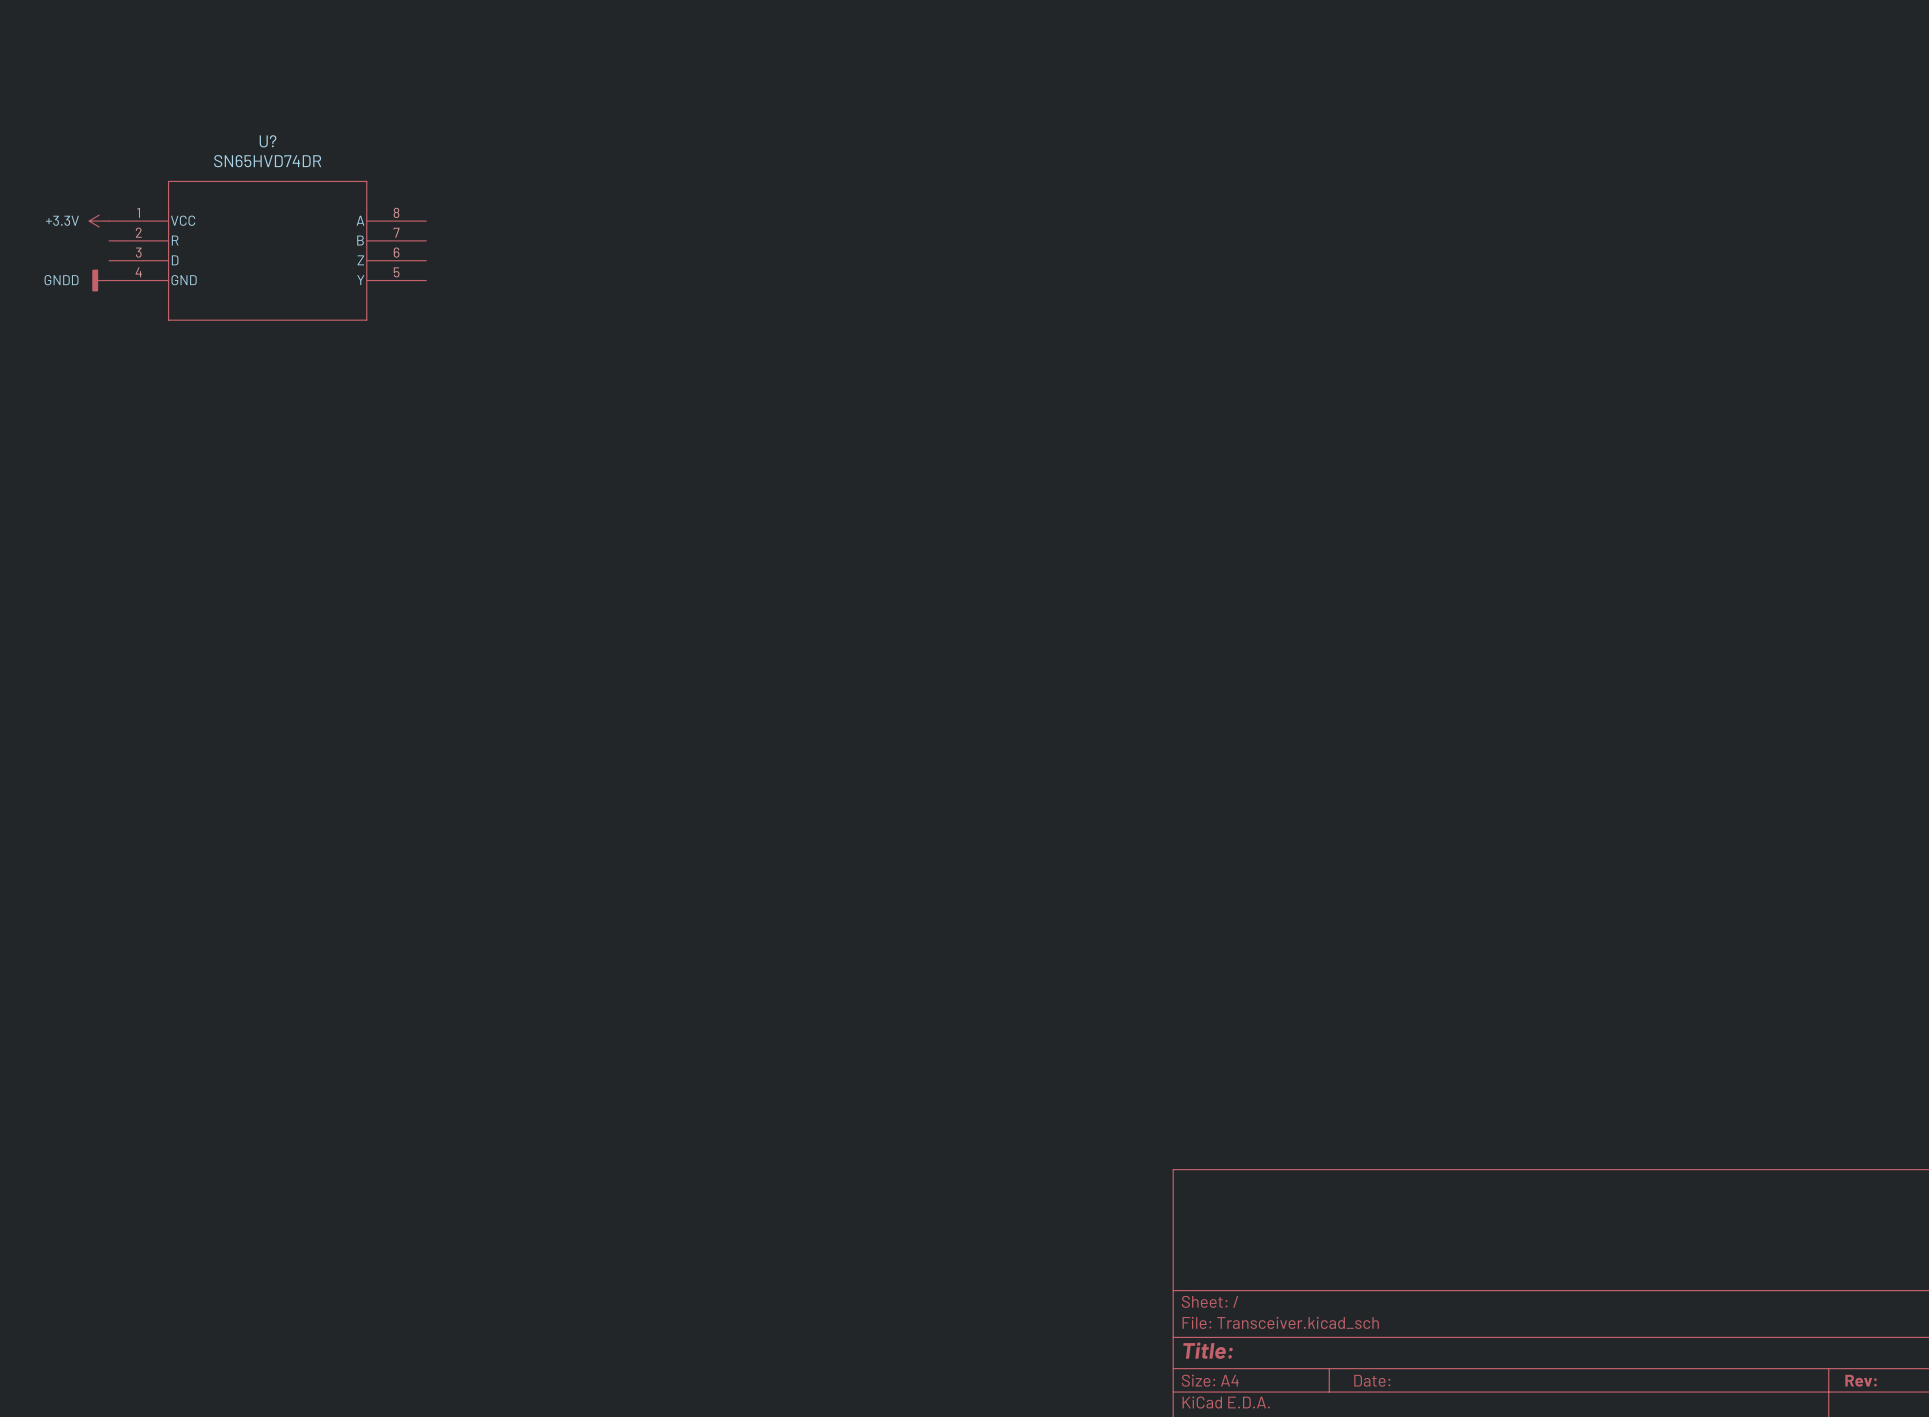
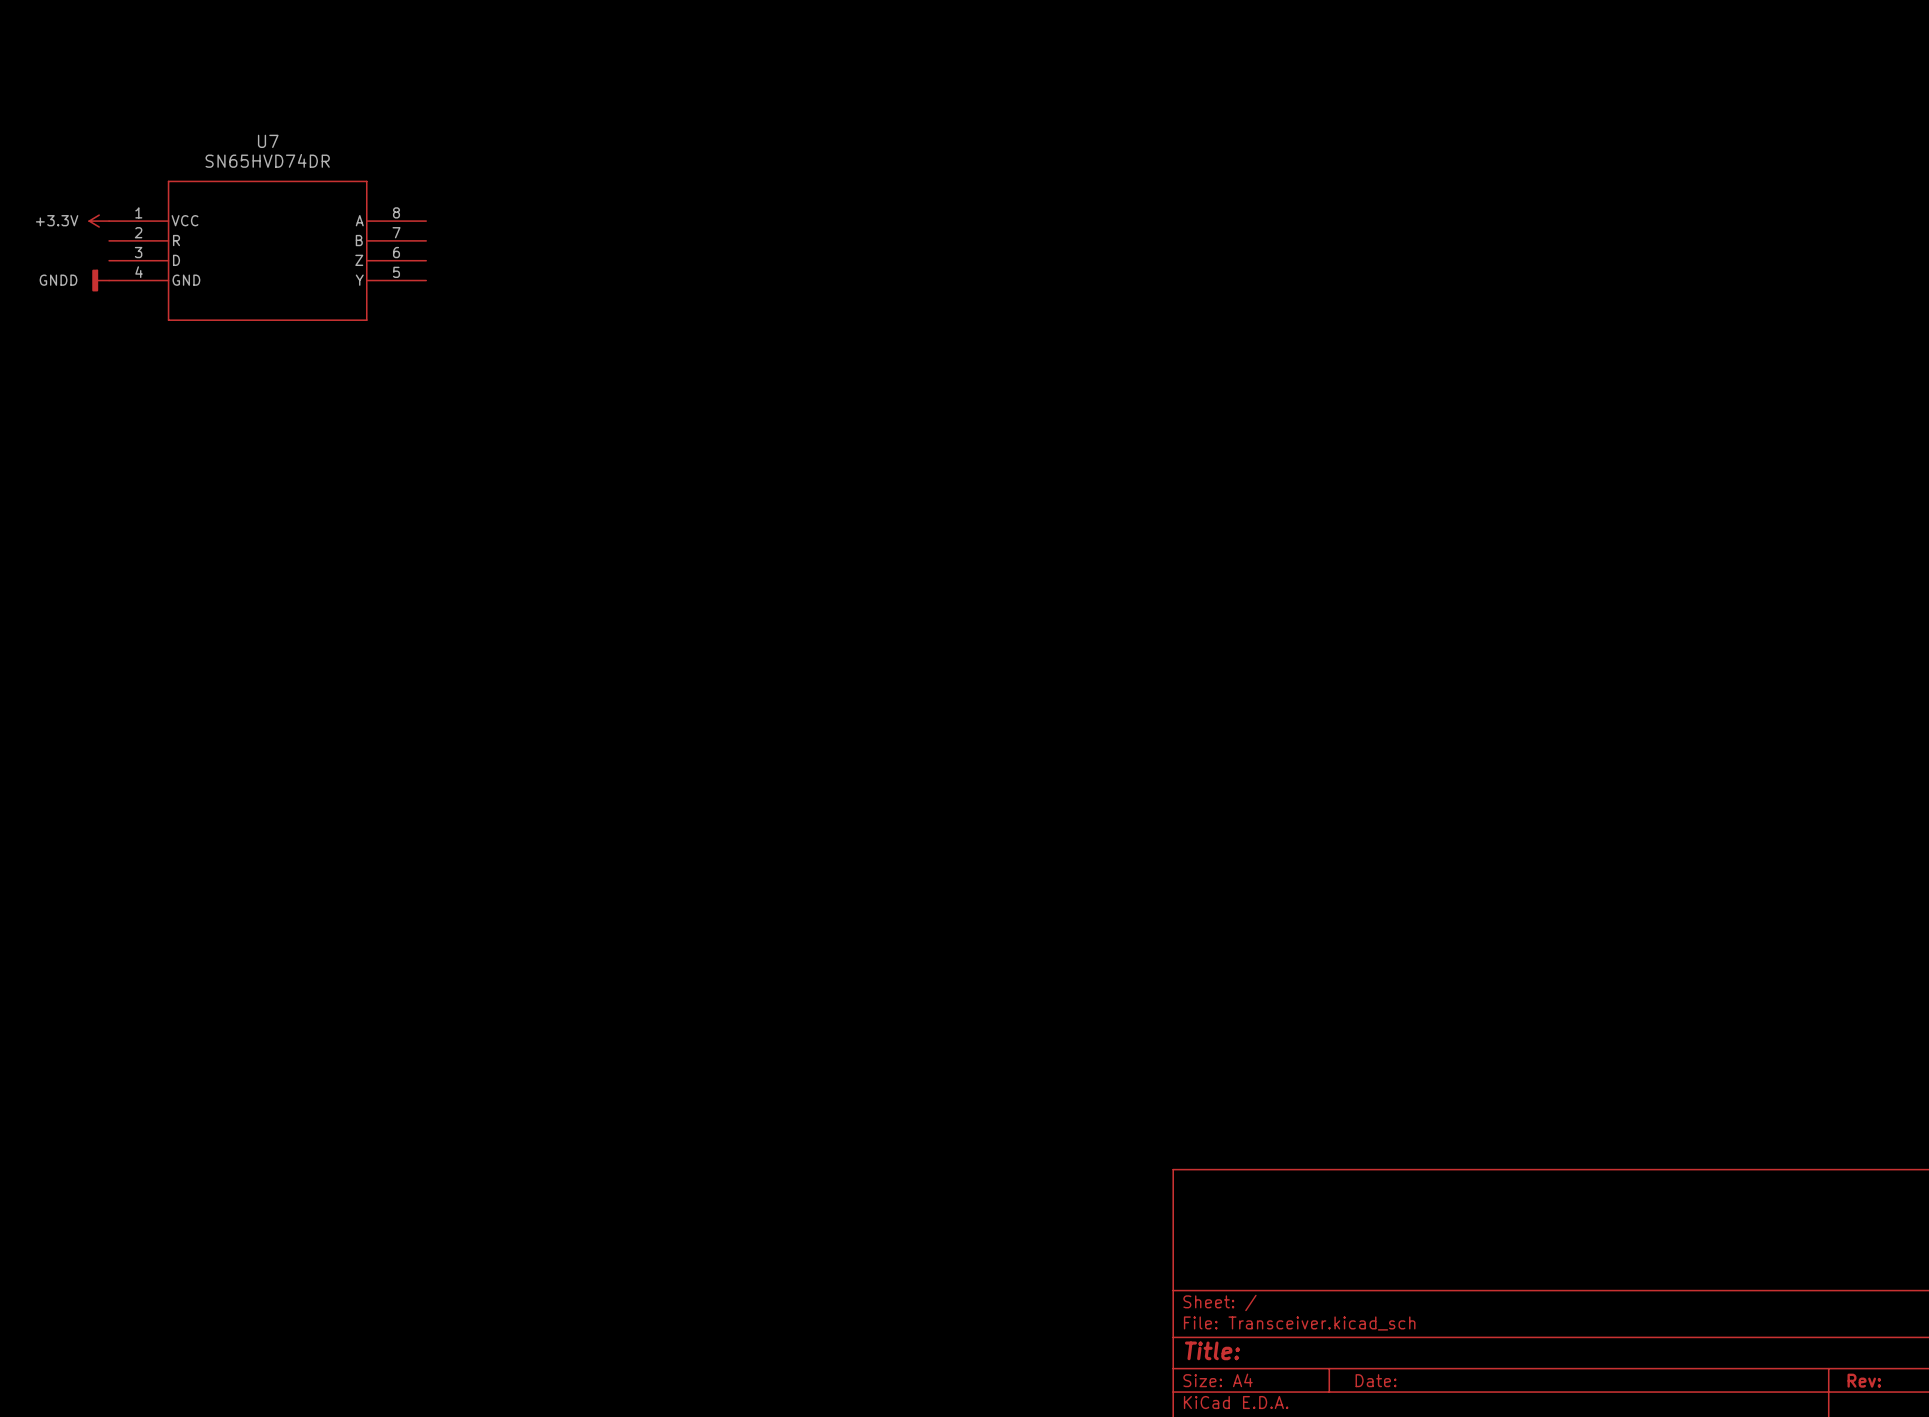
U? name: U? (268, 141) -> U7 (268, 141)

